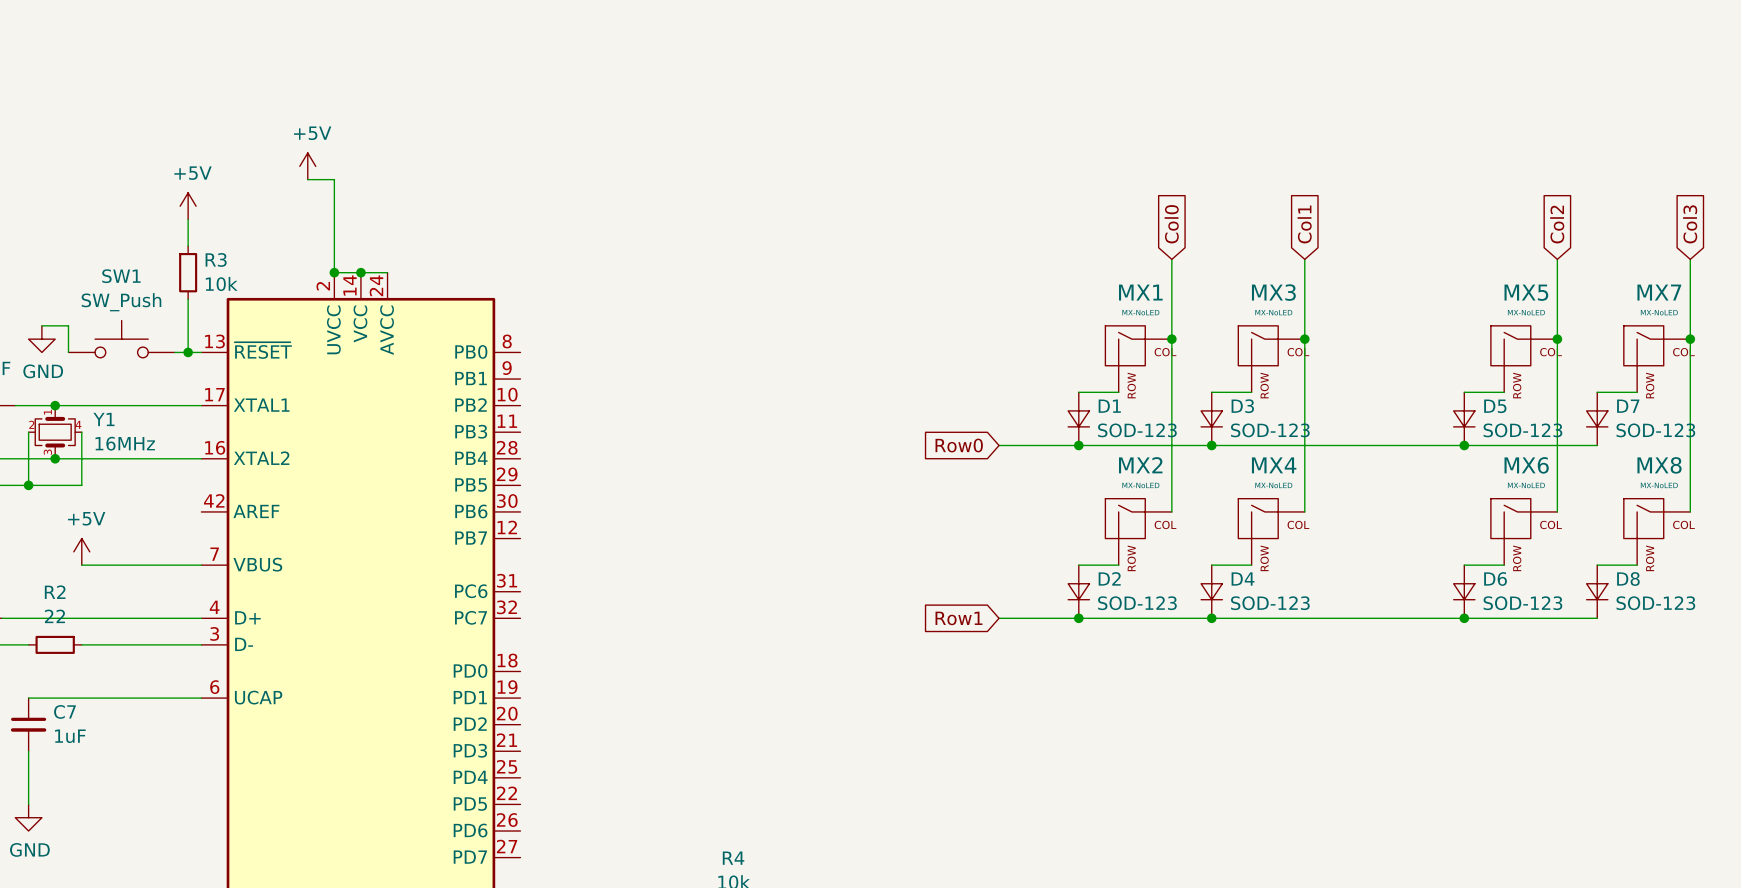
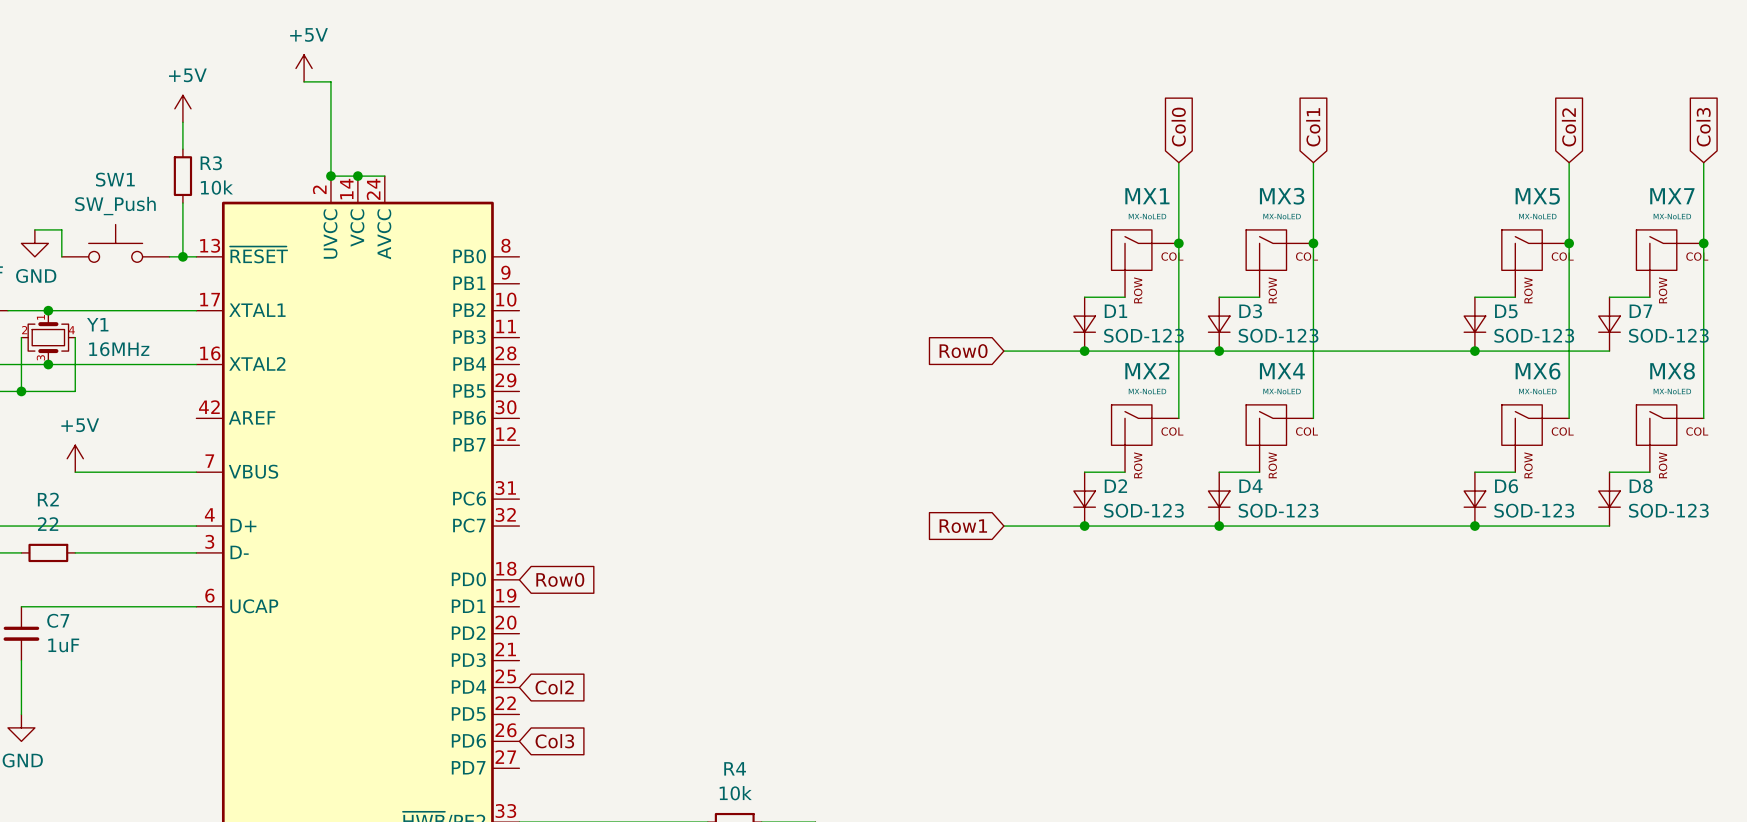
global label: none -> Row0 (560, 579)
global label: none -> Col2 (554, 687)
global label: none -> Col3 (554, 741)

